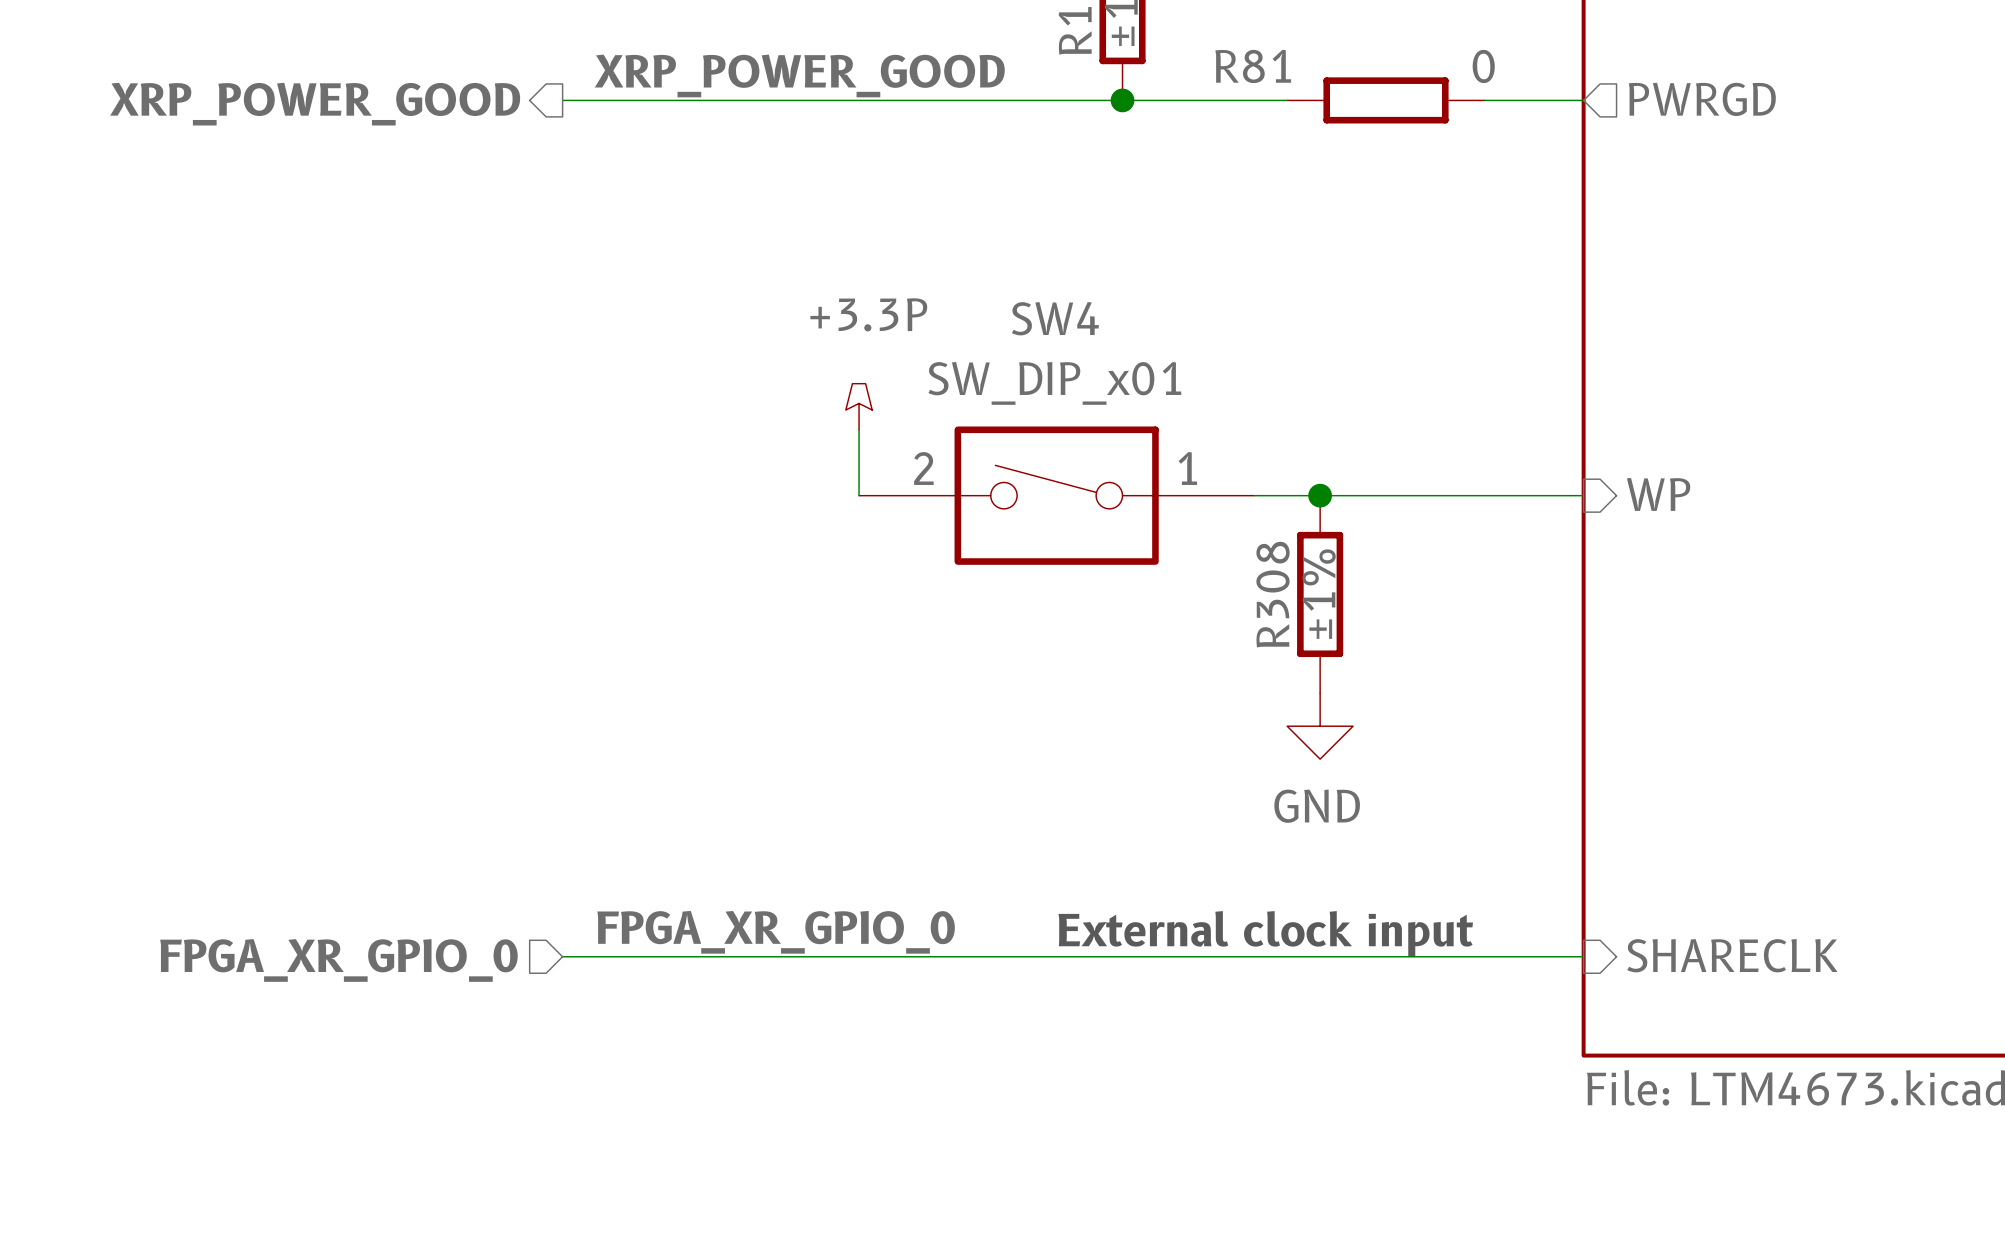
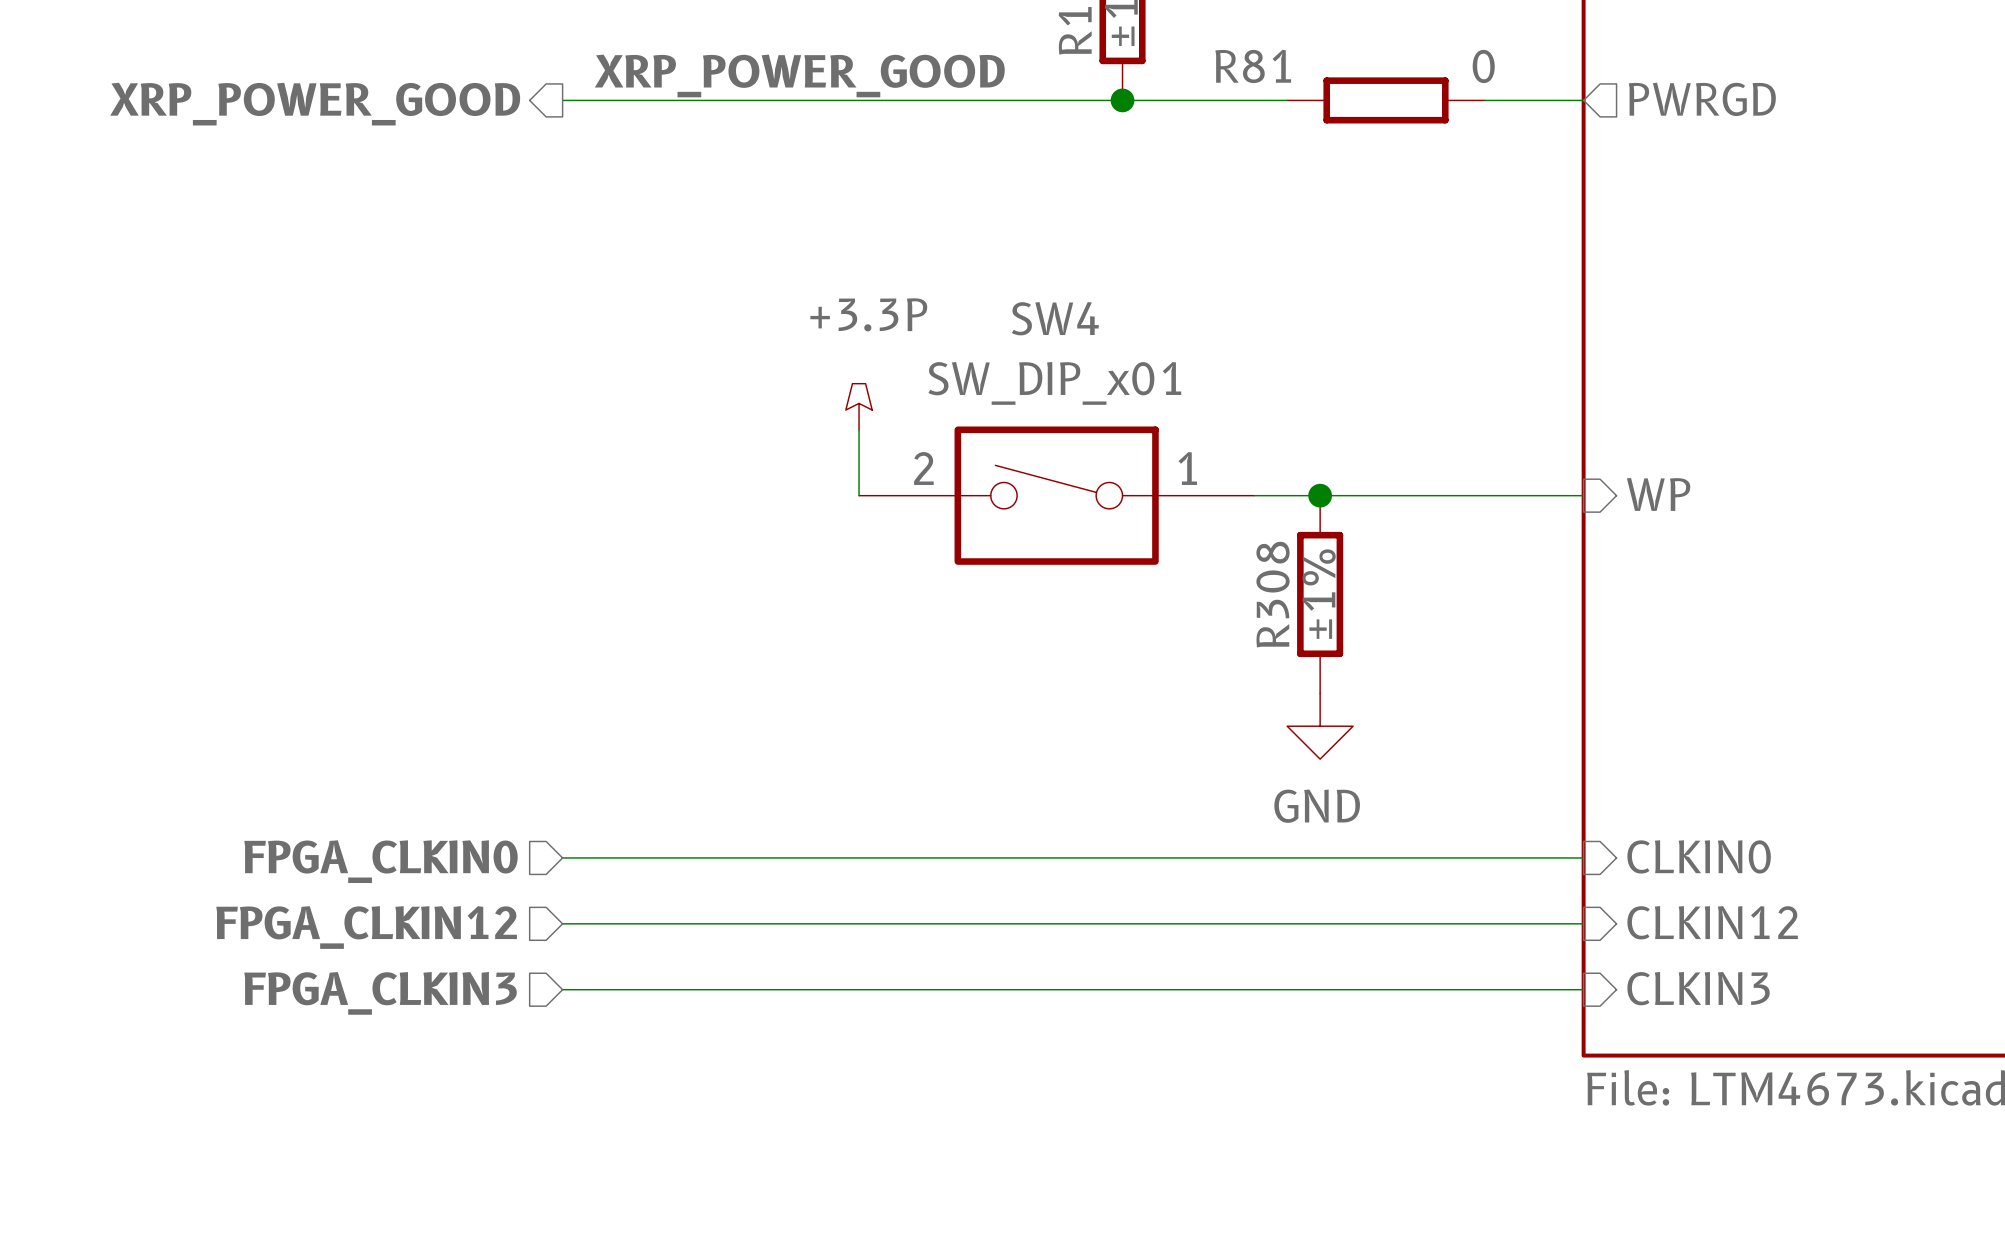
sheet pin: none -> CLKIN0 (1699, 856)
wire: none -> (562, 857) (1583, 857)
hierarchical label: none -> FPGA_CLKIN0 (381, 861)
sheet pin: none -> CLKIN12 (1712, 922)
hierarchical label: none -> FPGA_CLKIN12 (366, 927)
label: FPGA_XR_GPIO_0 (776, 932) -> none
text: External clock input (1265, 934) -> none
sheet pin: SHARECLK (1732, 955) -> none
wire: (562, 956) (1583, 956) -> (562, 923) (1583, 923)
hierarchical label: FPGA_XR_GPIO_0 (338, 960) -> none
sheet pin: none -> CLKIN3 (1698, 988)
wire: none -> (562, 989) (1583, 989)
hierarchical label: none -> FPGA_CLKIN3 (380, 993)

